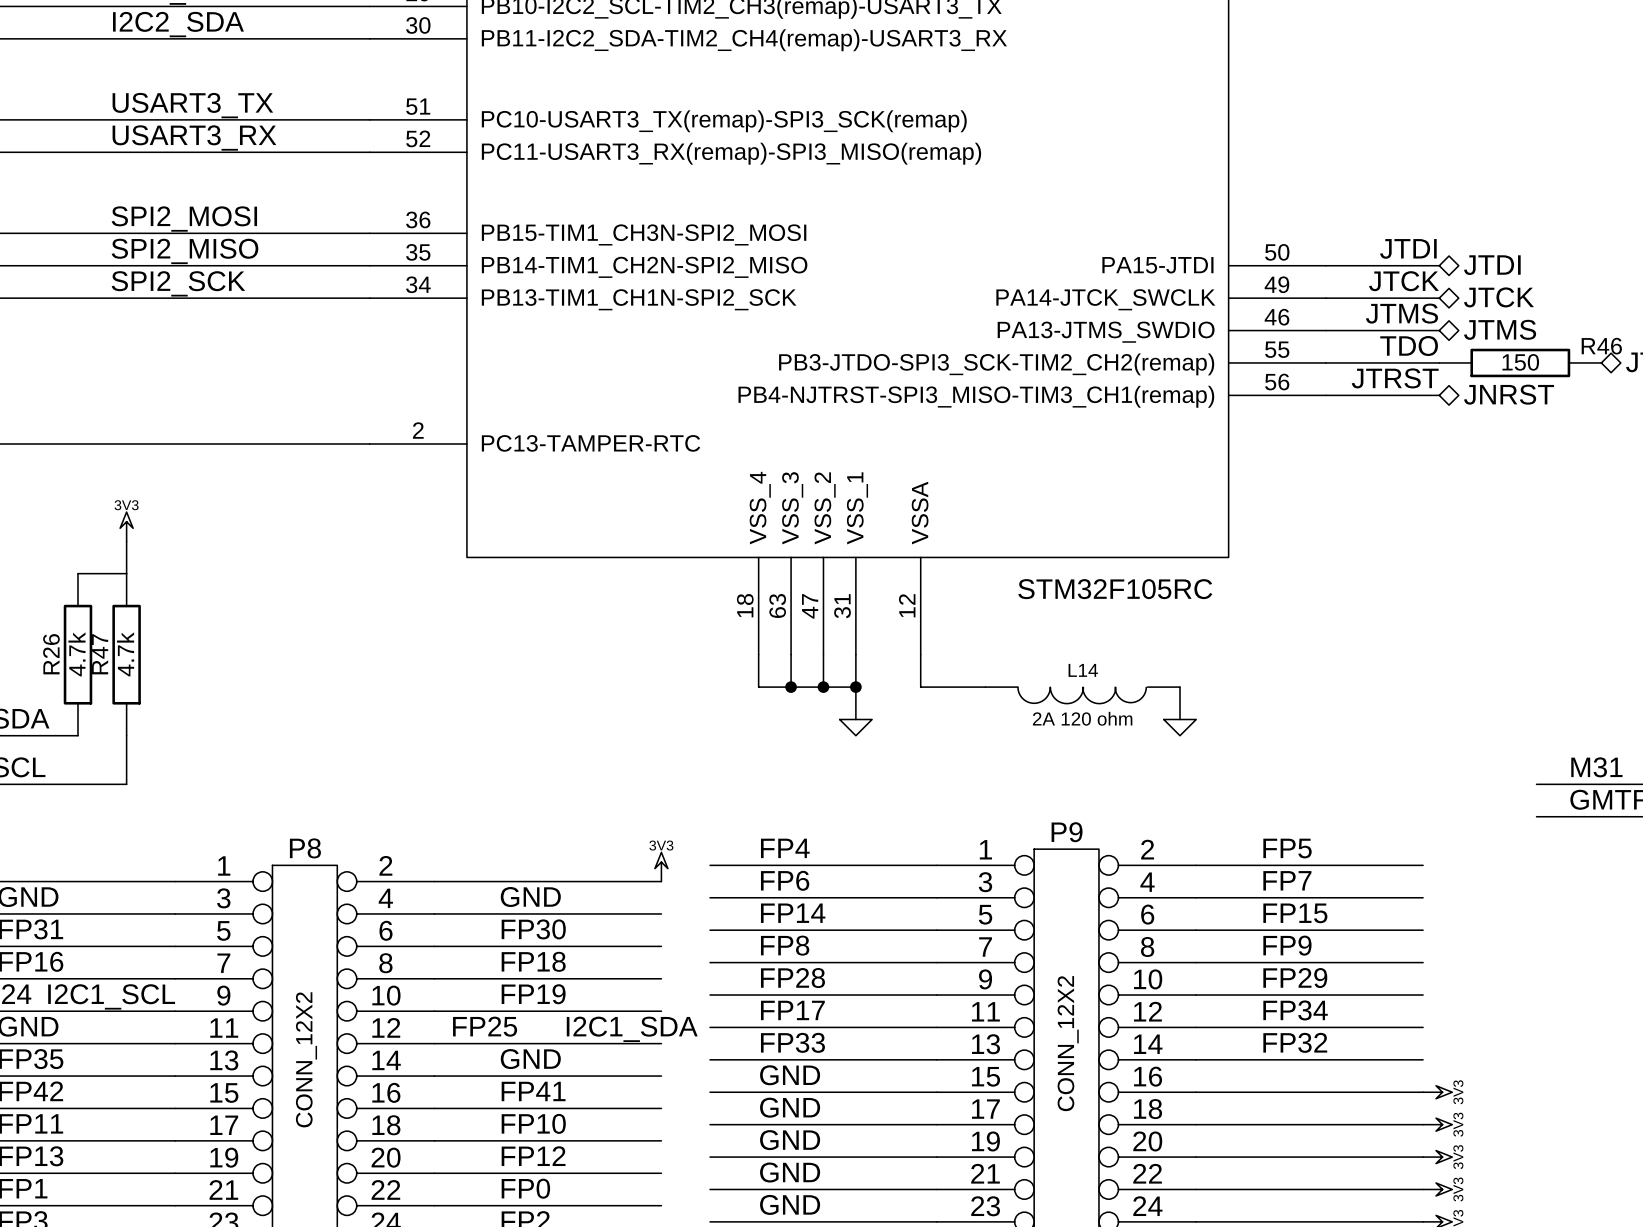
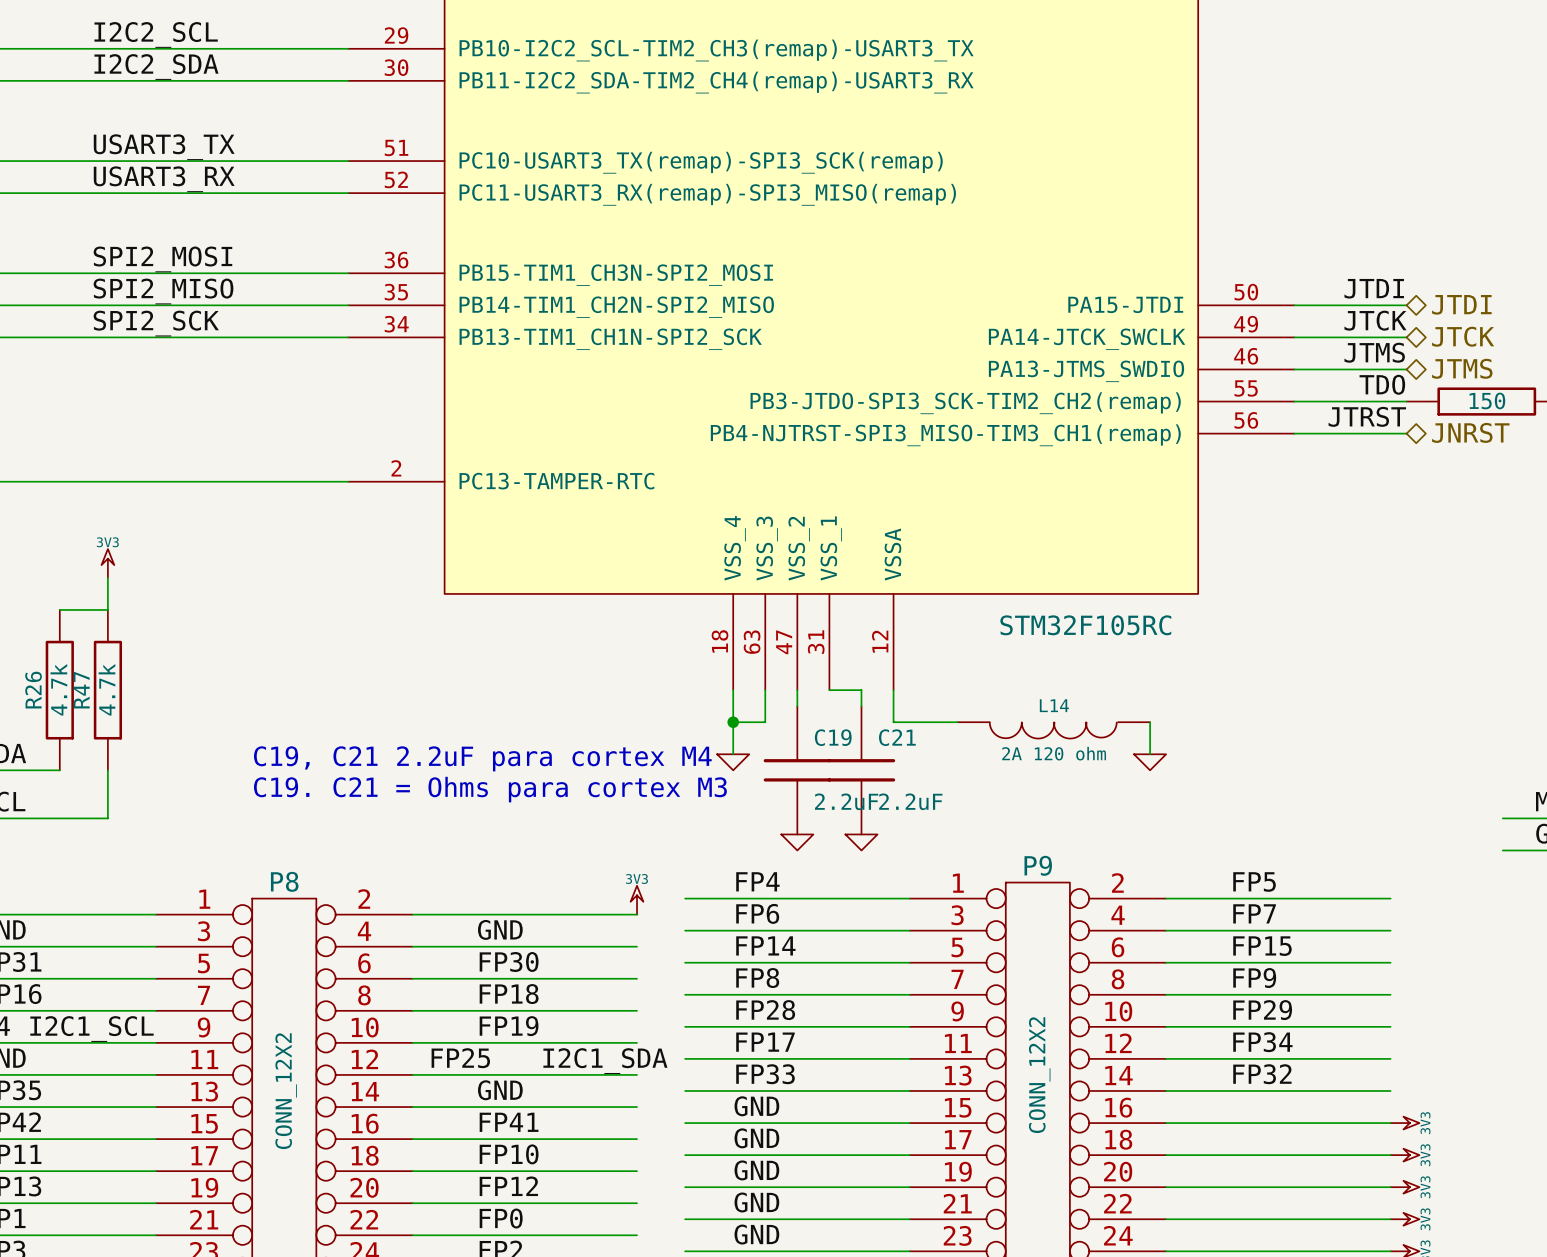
wire: (855, 654) (855, 719) -> (829, 690) (861, 690) (861, 706)
wire: none -> (733, 722) (733, 754)
junction: none -> (733, 722)
wire: (791, 687) (855, 687) -> none
junction: (791, 687) -> none
junction: (823, 687) -> none
junction: (855, 687) -> none
text: none -> C19, C21 2.2uF para cortex M4 (482, 758)
power symbol: none -> (733, 762)
power symbol: (855, 727) -> none
C19: none -> 2.2uF (797, 770)
C21: none -> 2.2uF (861, 770)
text: none -> C19. C21 = Ohms para cortex M3 (490, 789)
power symbol: none -> (797, 842)
power symbol: none -> (861, 842)

